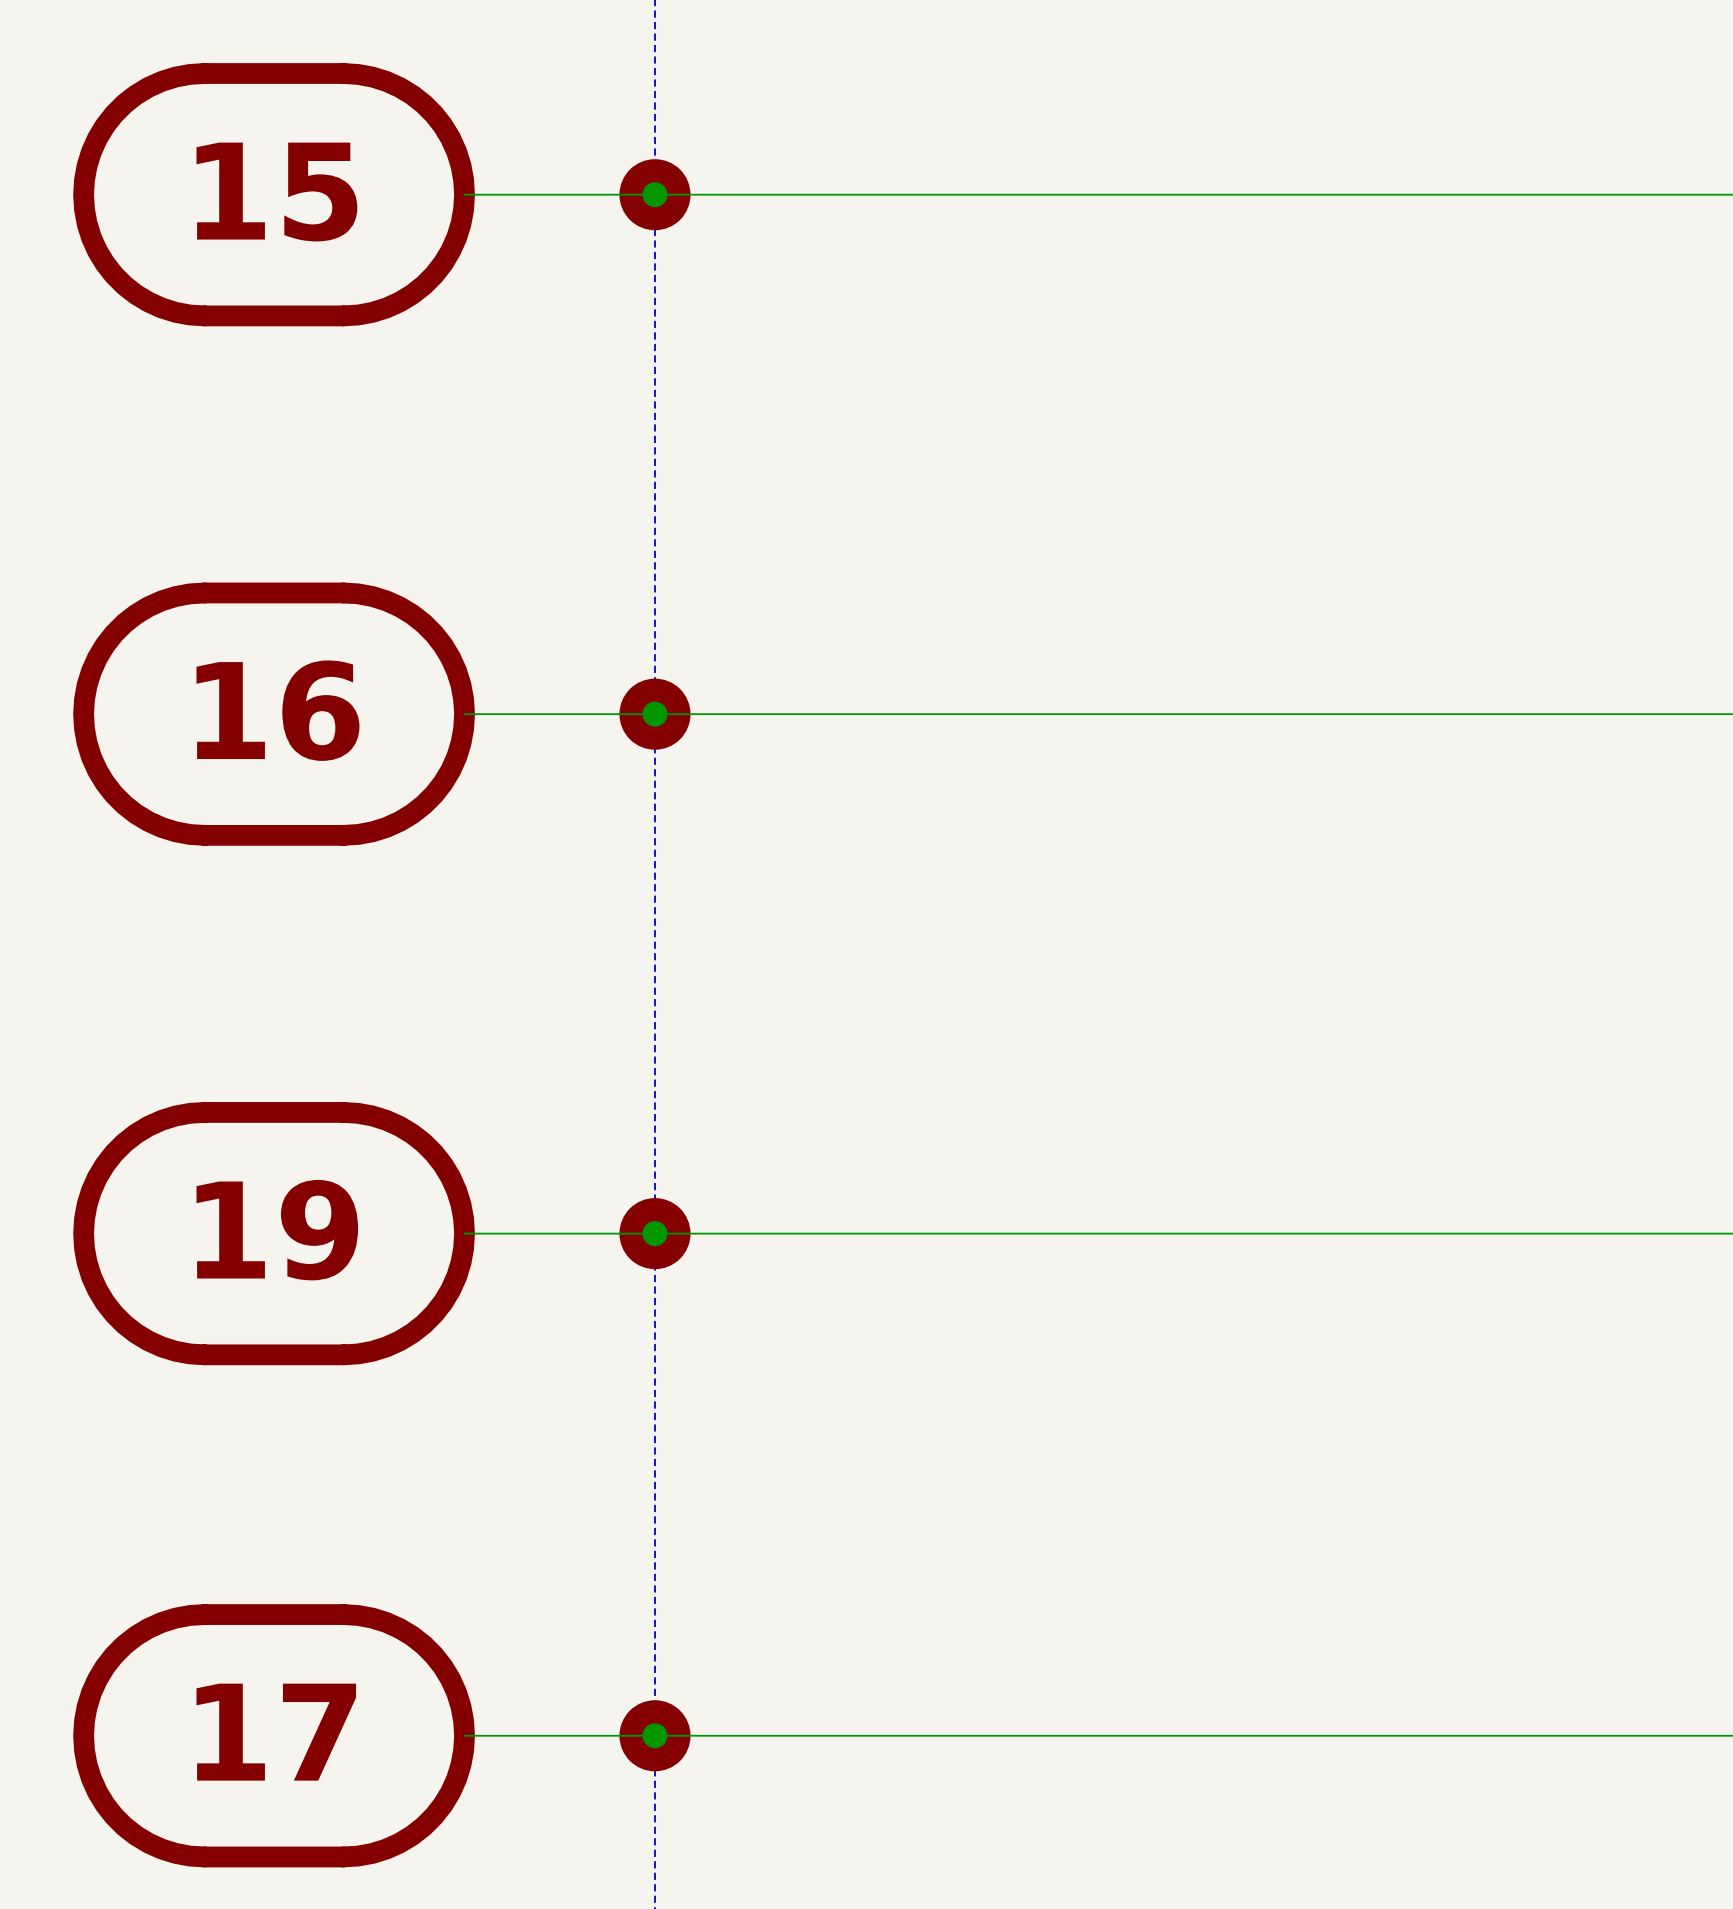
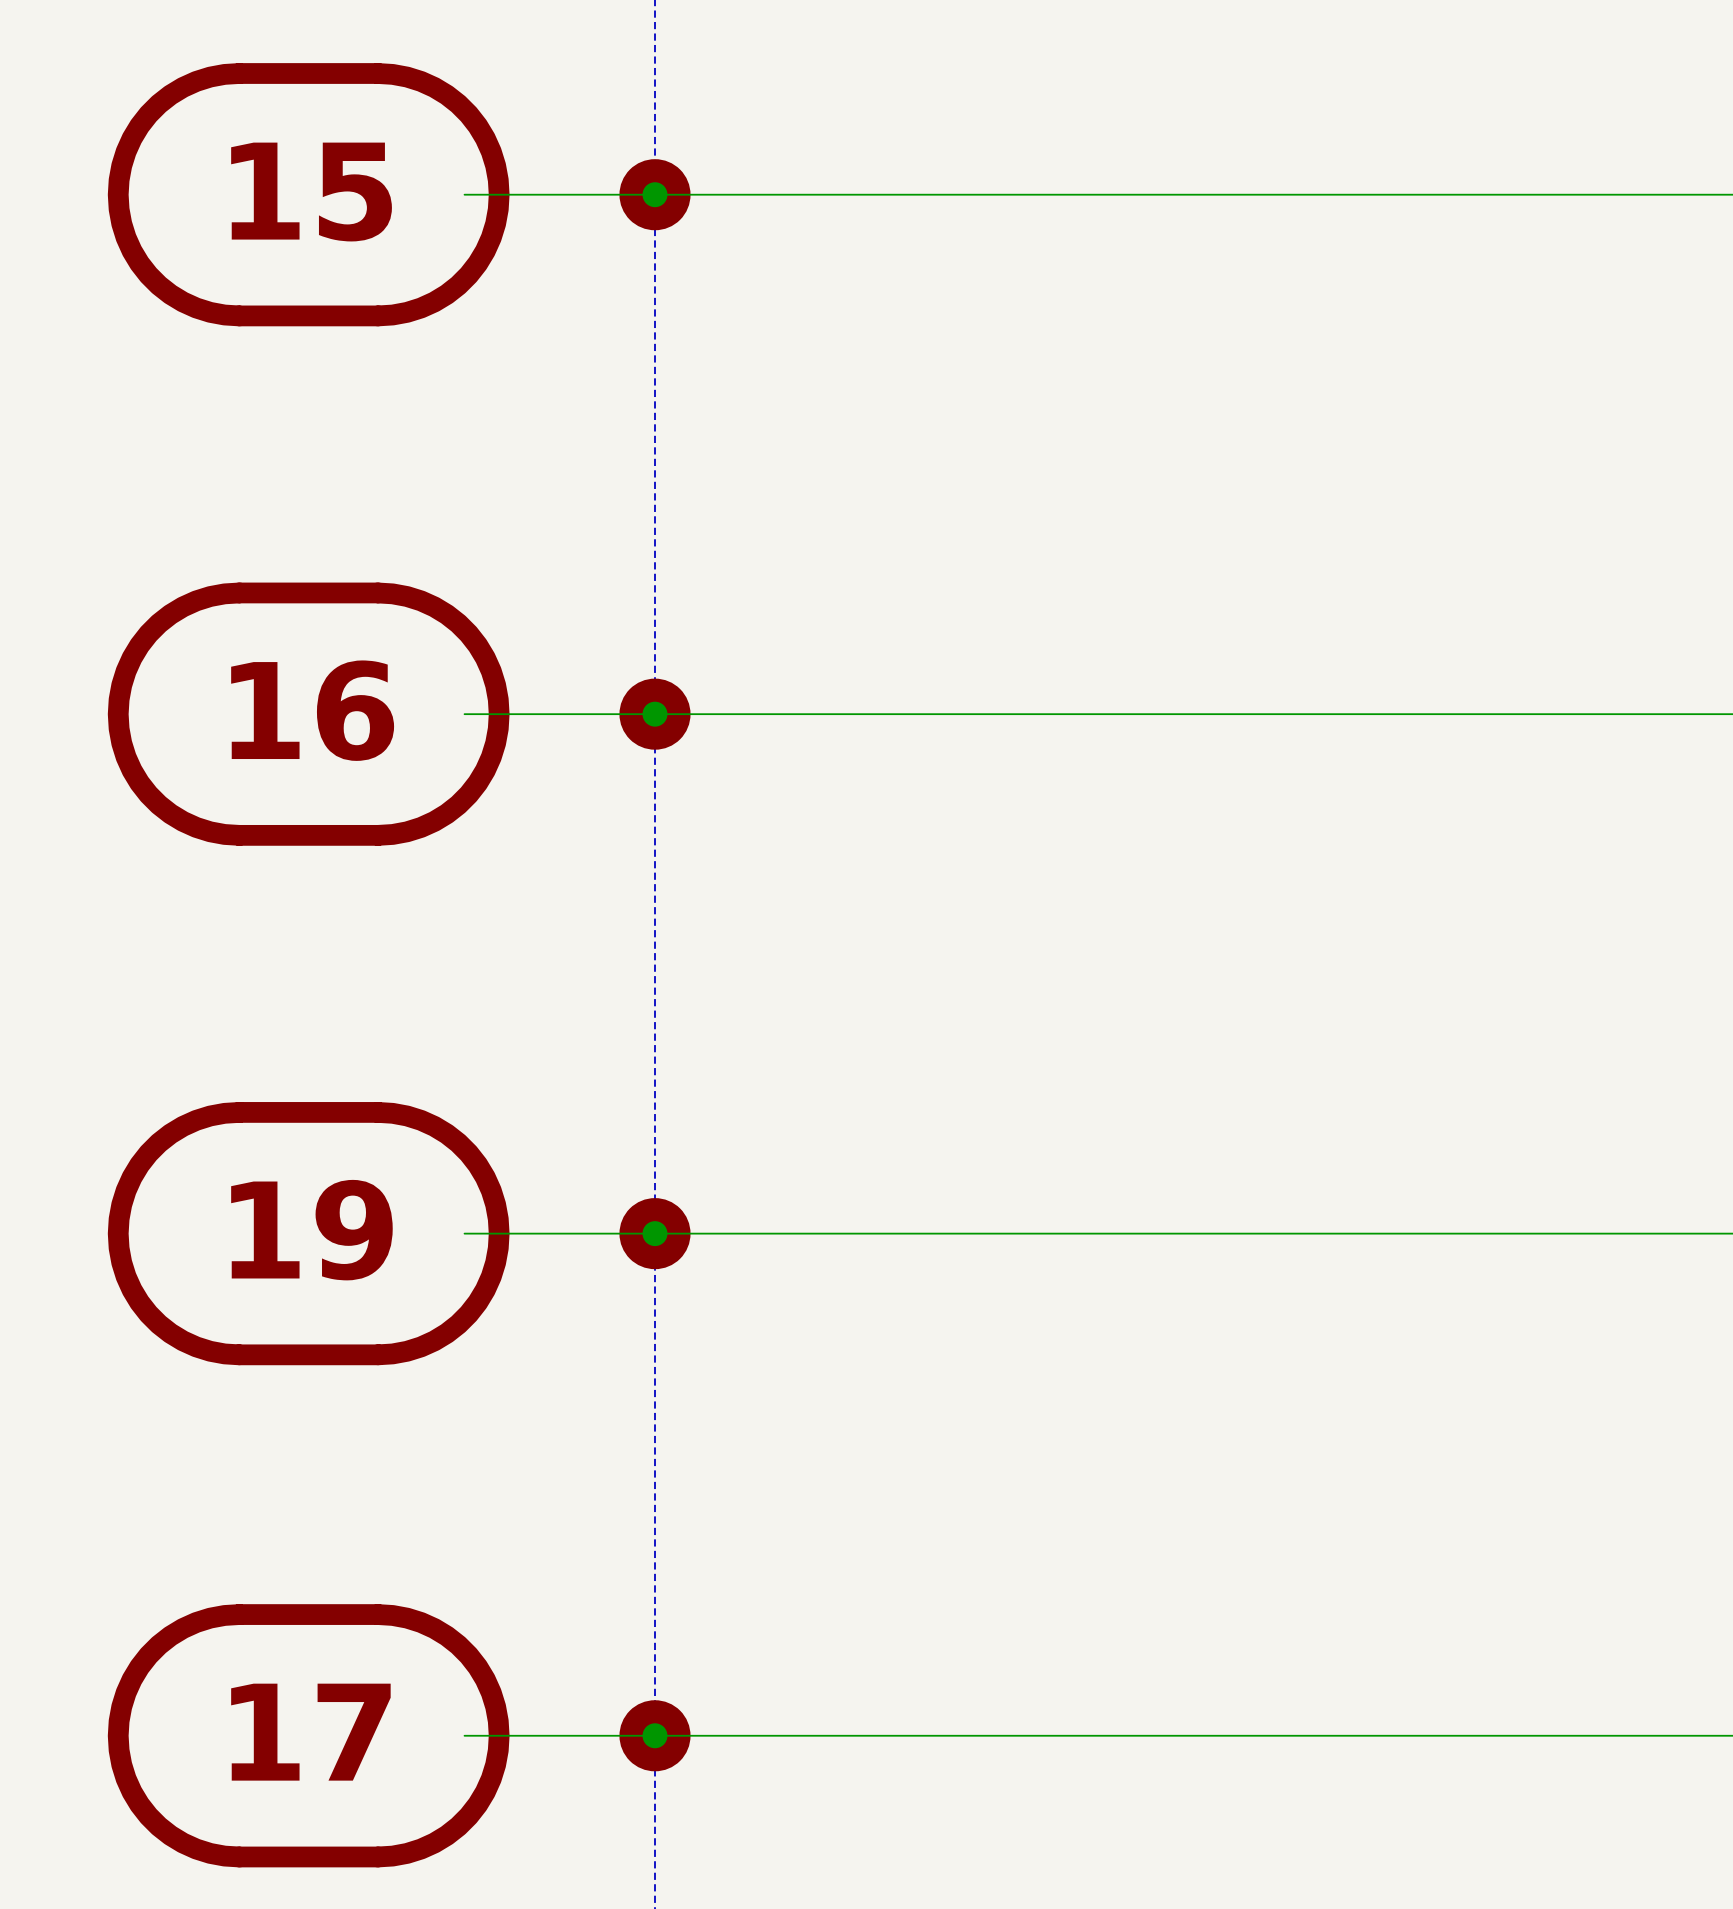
part position: (274, 194) -> (308, 194)
part position: (274, 714) -> (308, 714)
part position: (274, 1233) -> (308, 1233)
part position: (274, 1735) -> (308, 1735)

